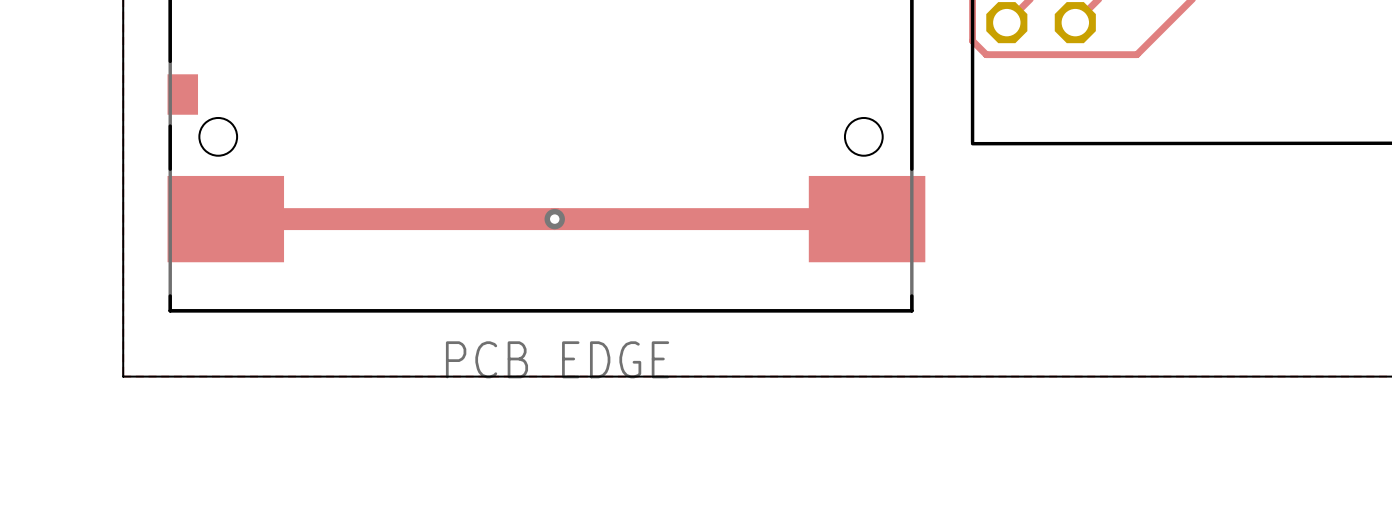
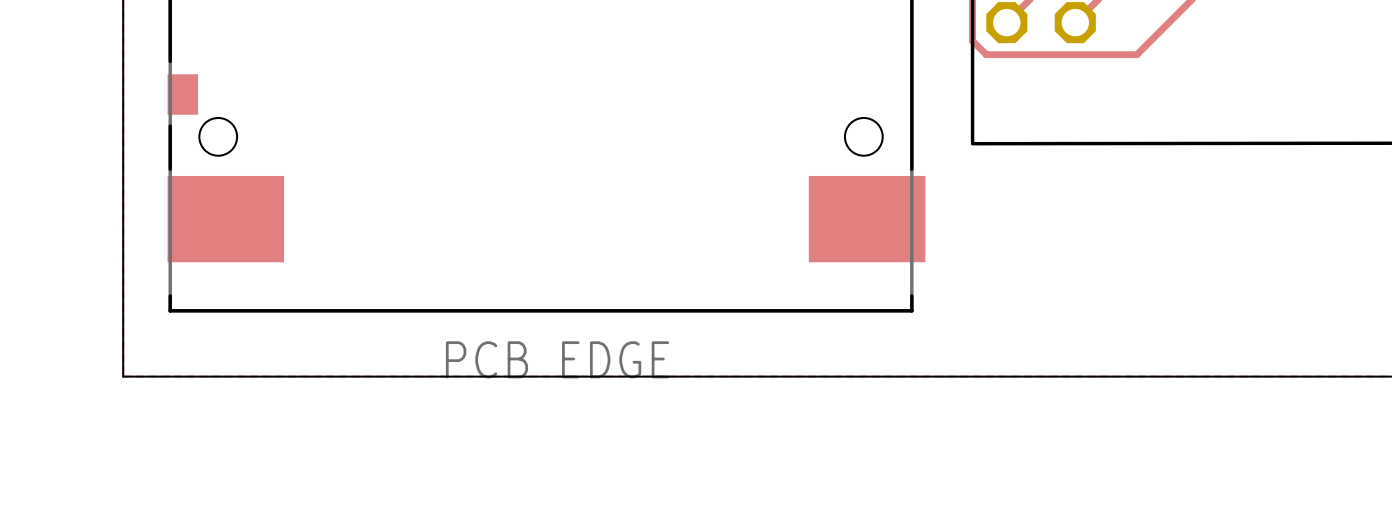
track: (225, 219) (867, 219) -> none
via: (554, 219) -> none

